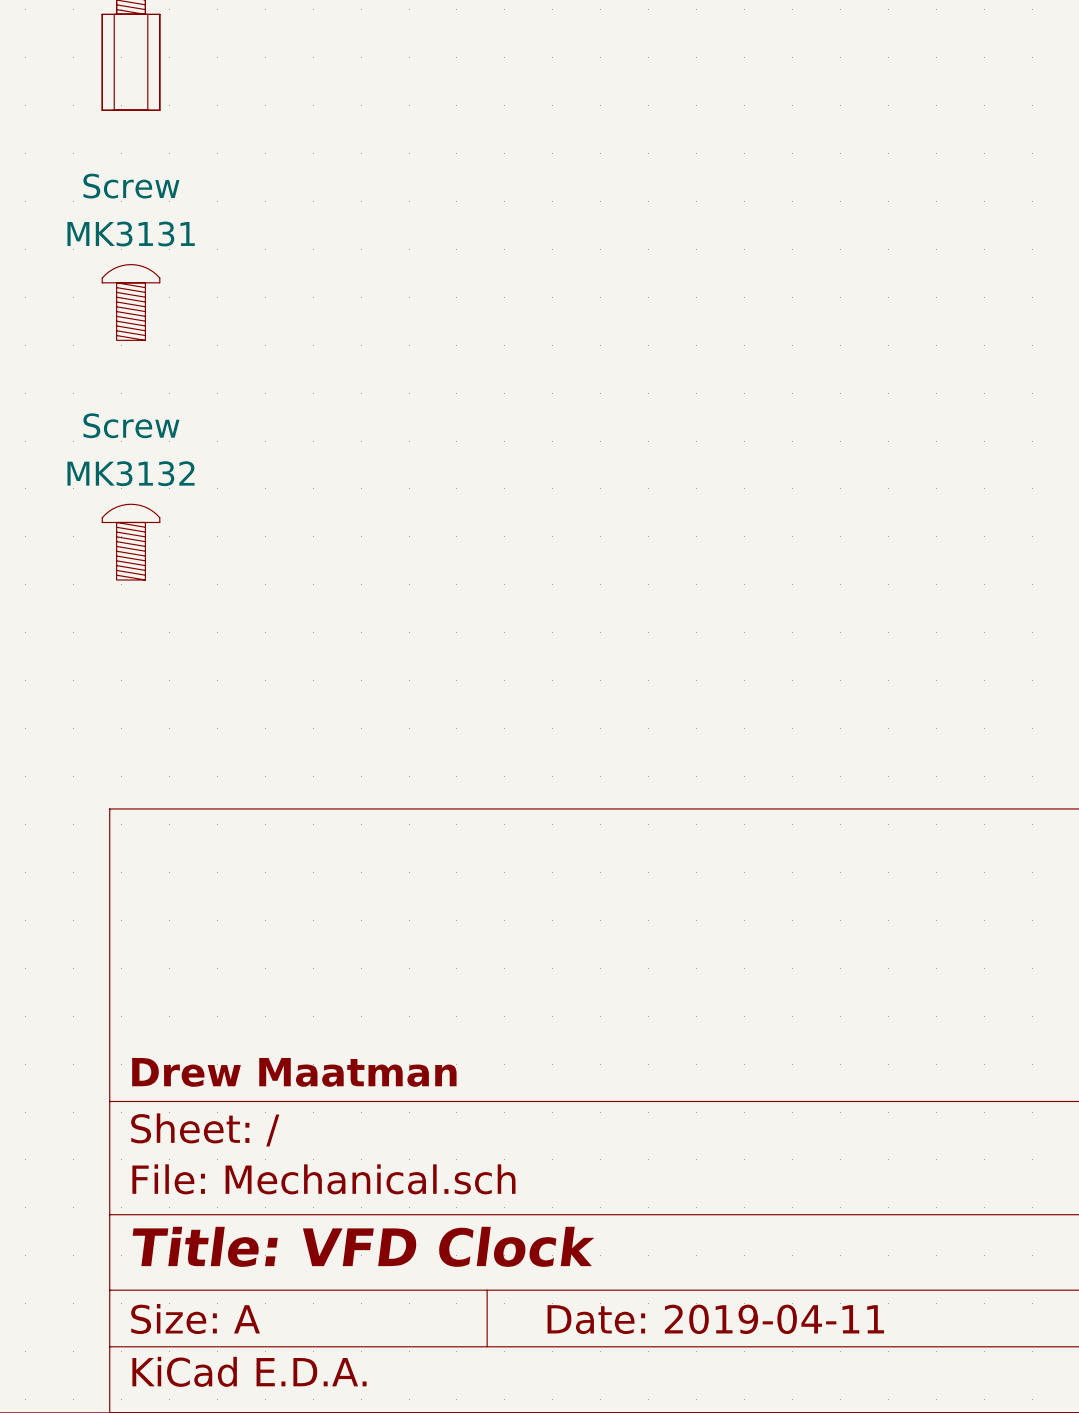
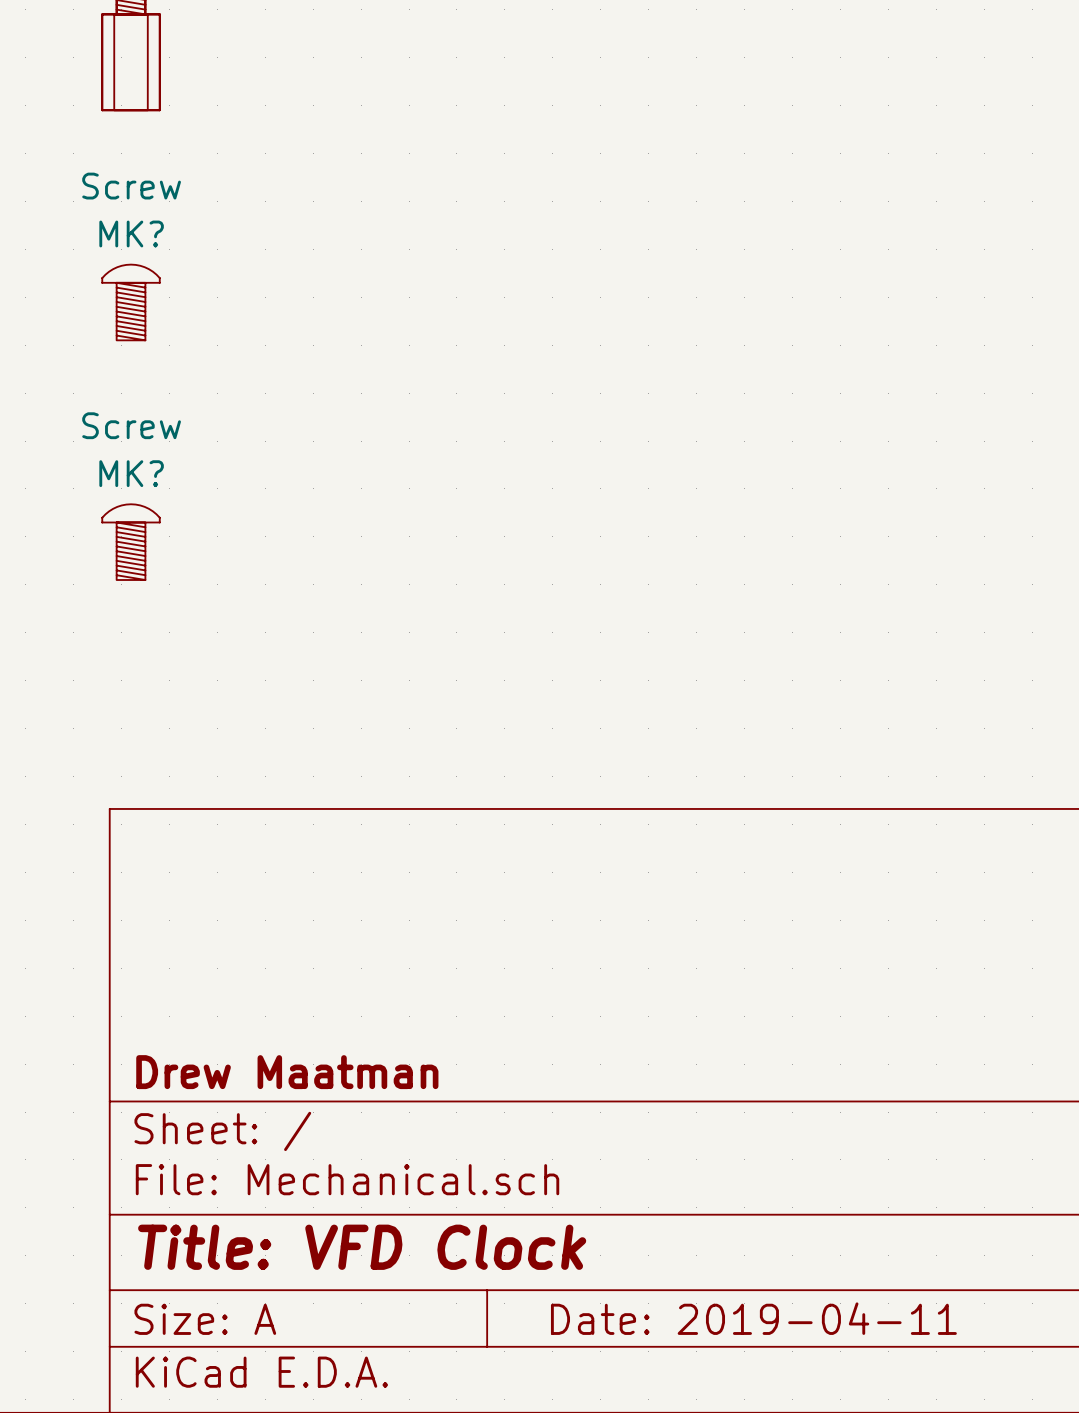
MK3131 name: MK3131 (131, 234) -> MK? (131, 233)
MK3132 name: MK3132 (130, 473) -> MK? (131, 473)

